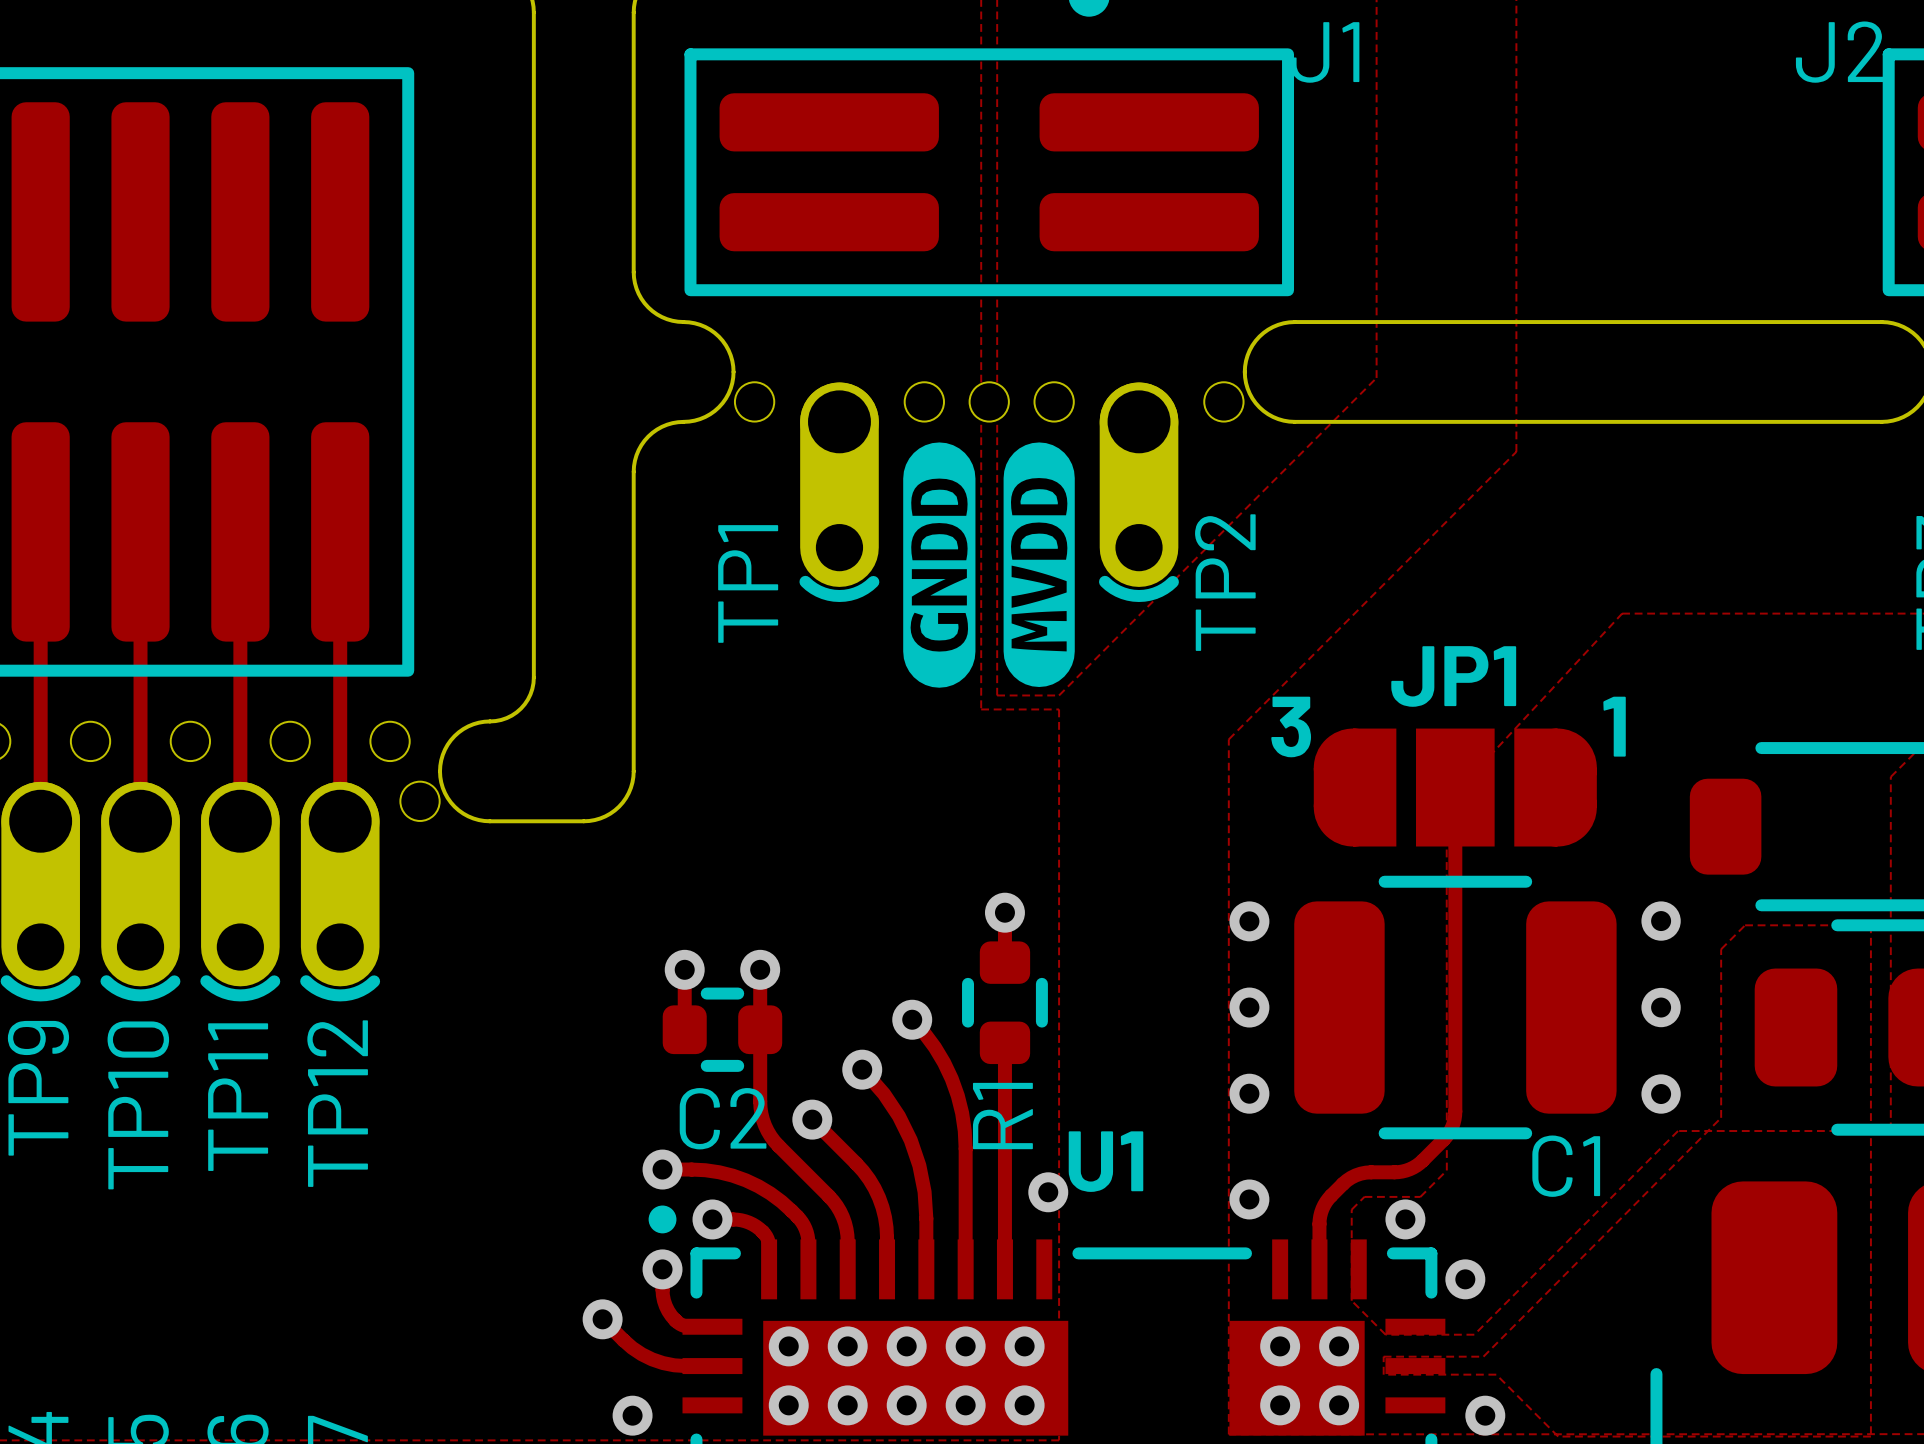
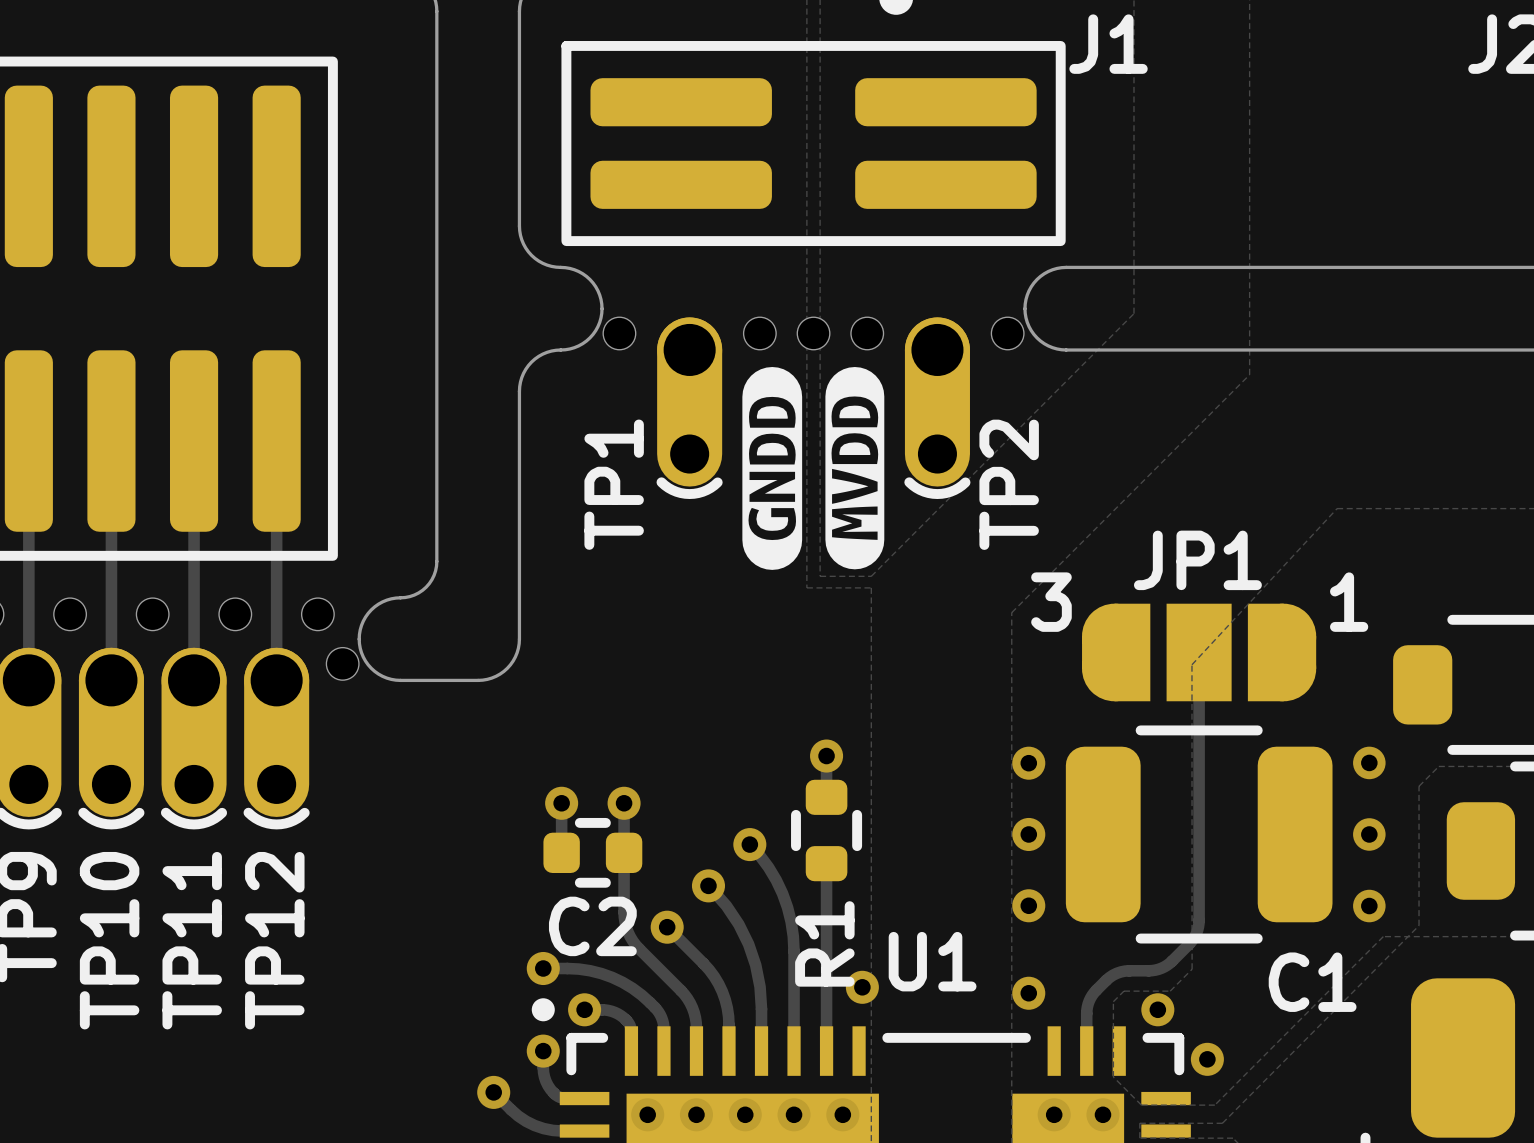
C1 name position: C1 (1566, 1166) -> C1 (1312, 982)

